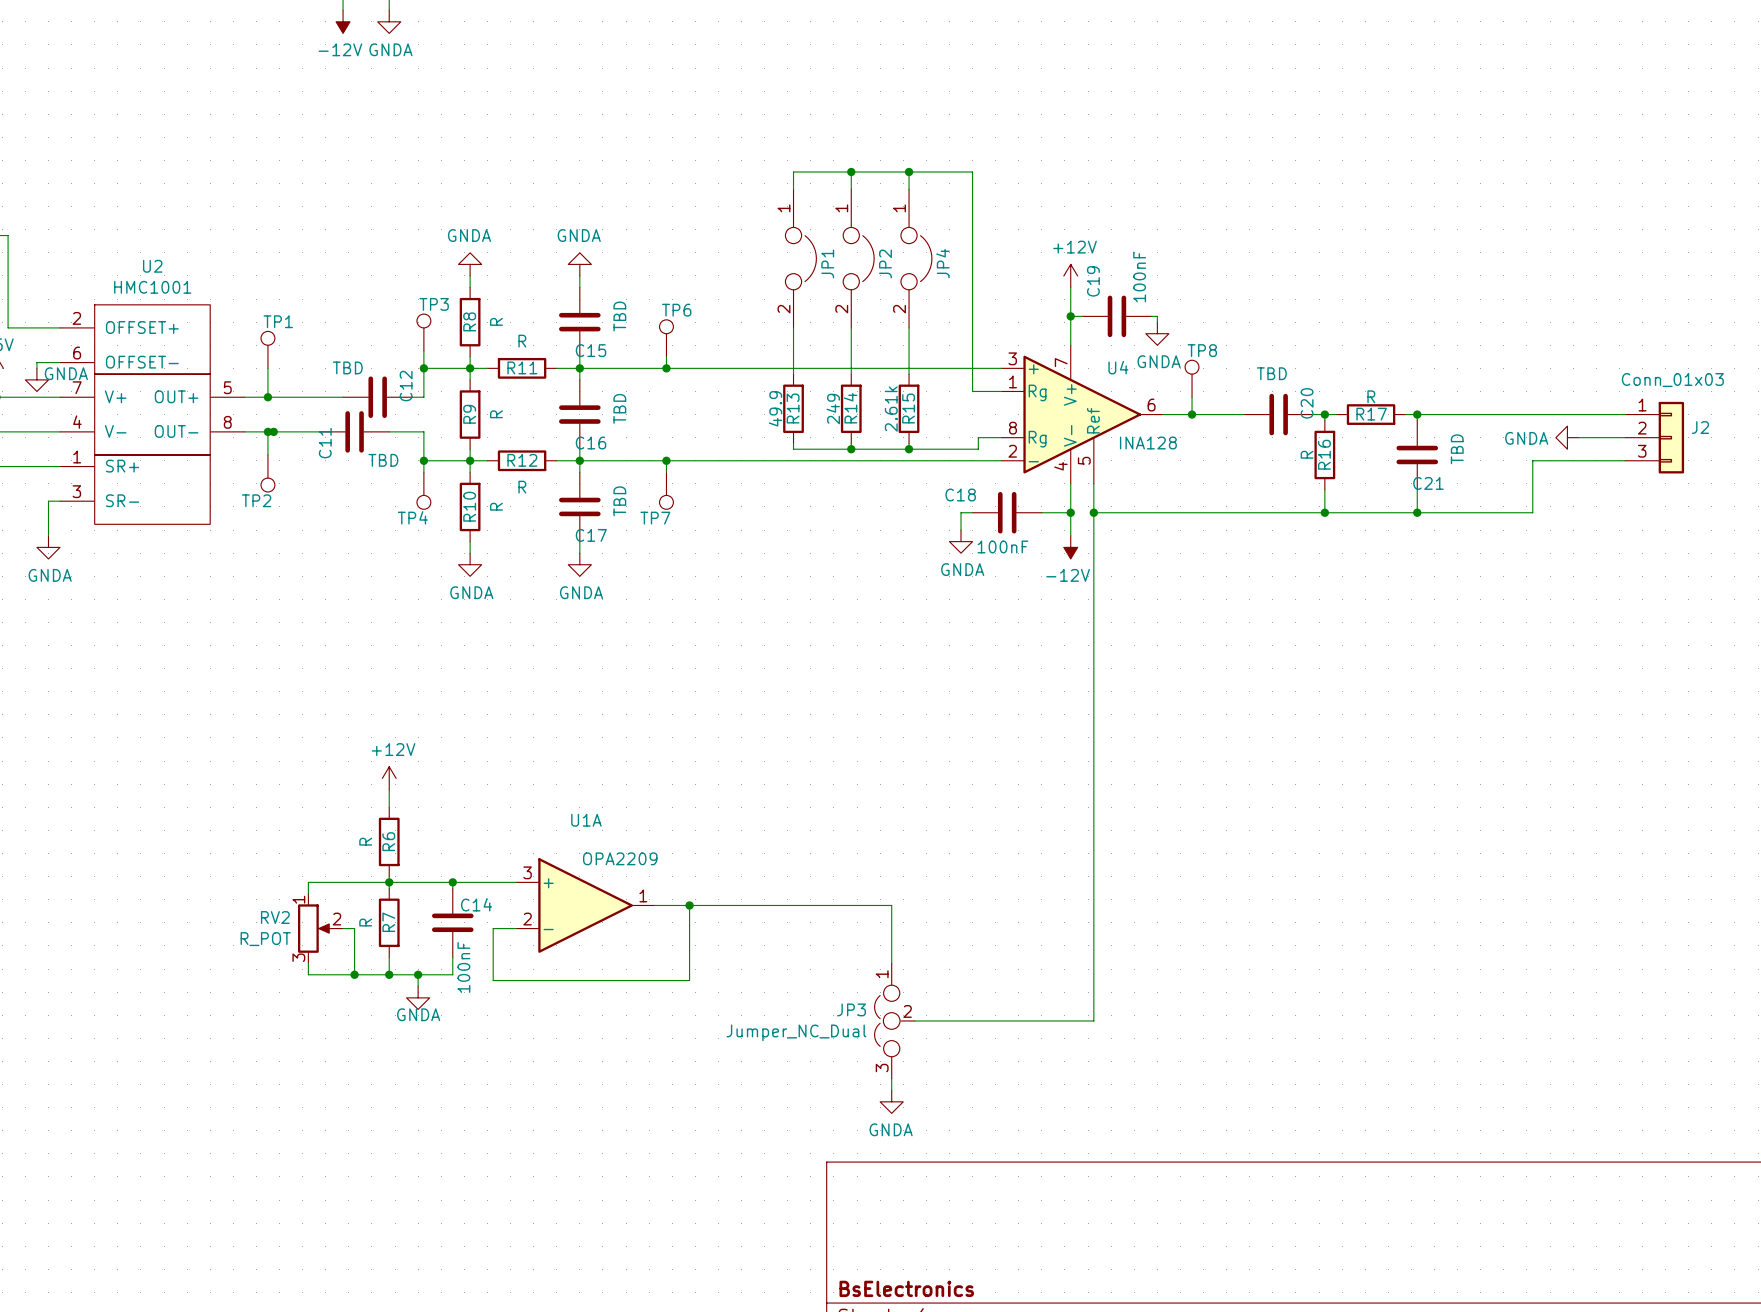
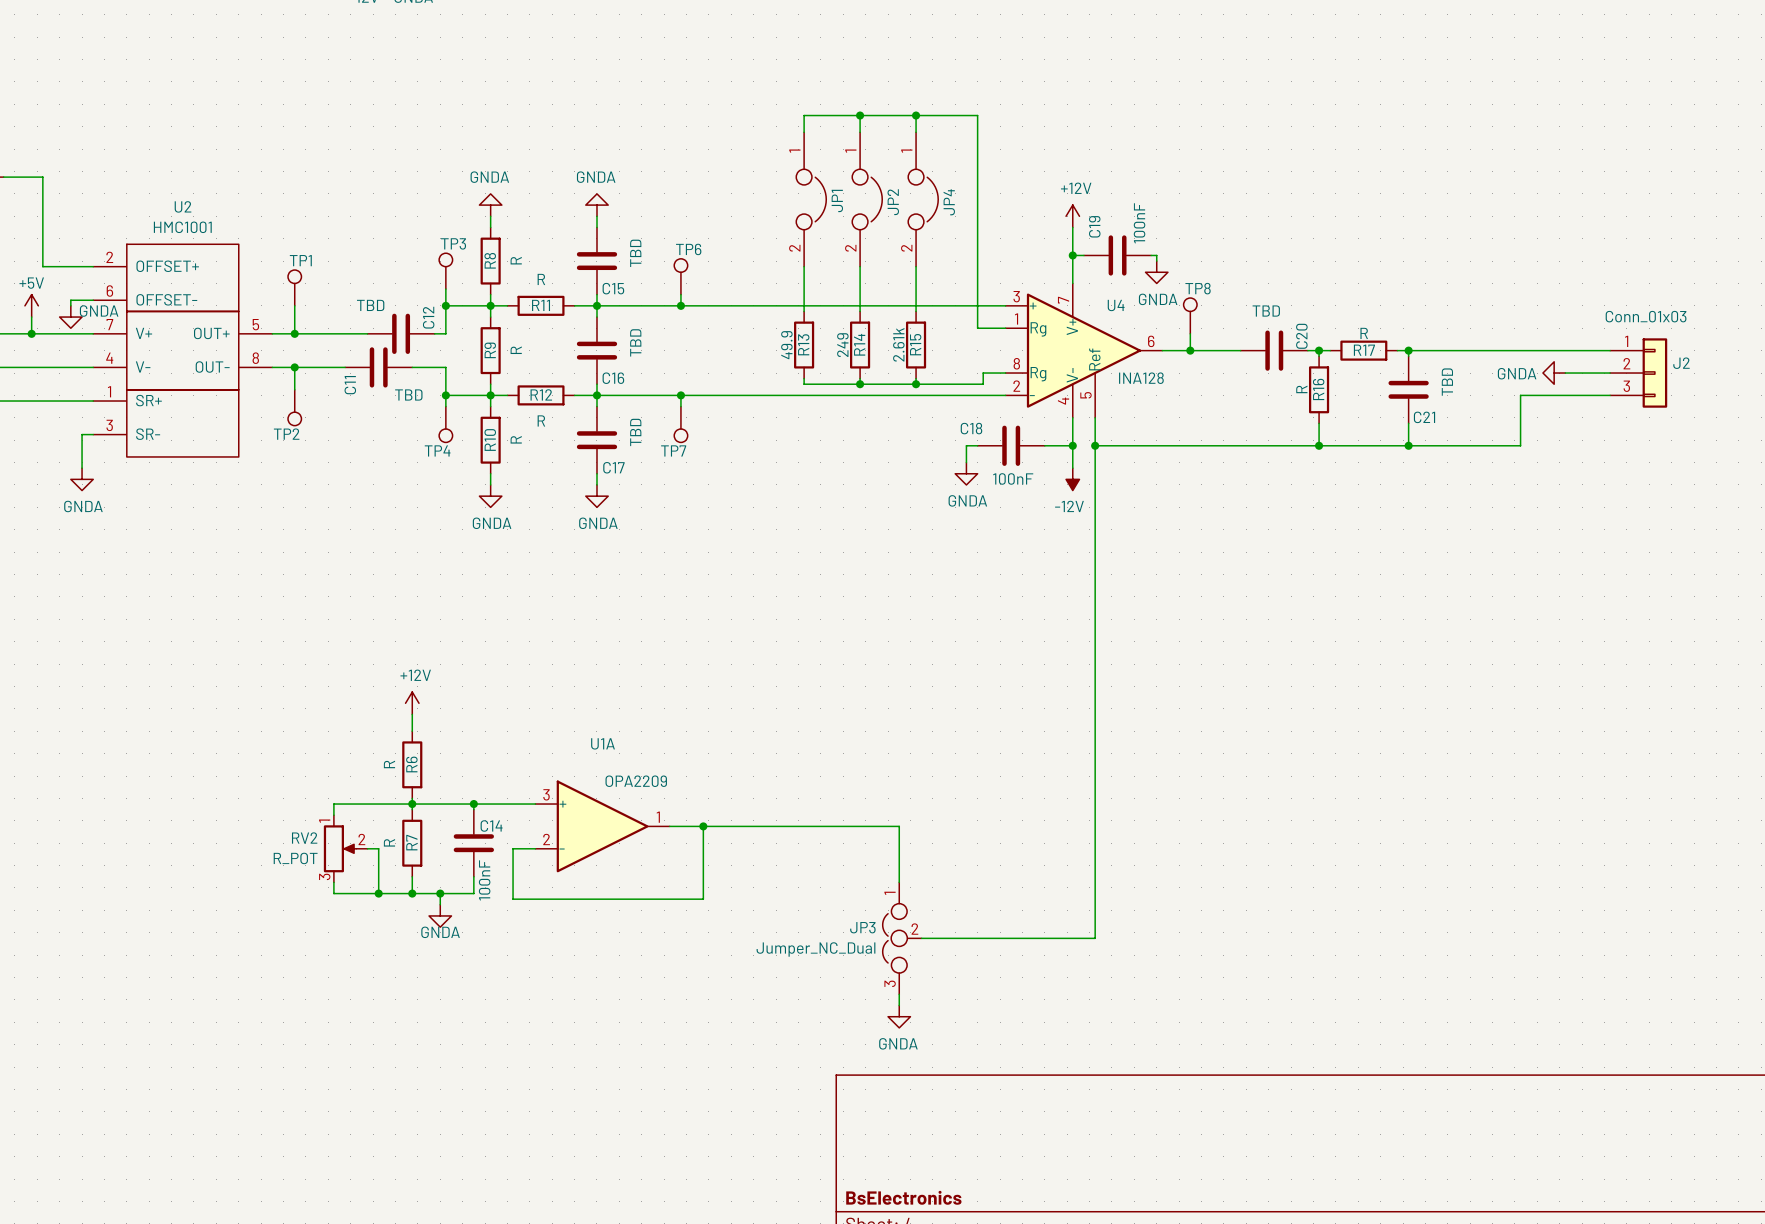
junction: (273, 431) -> none

